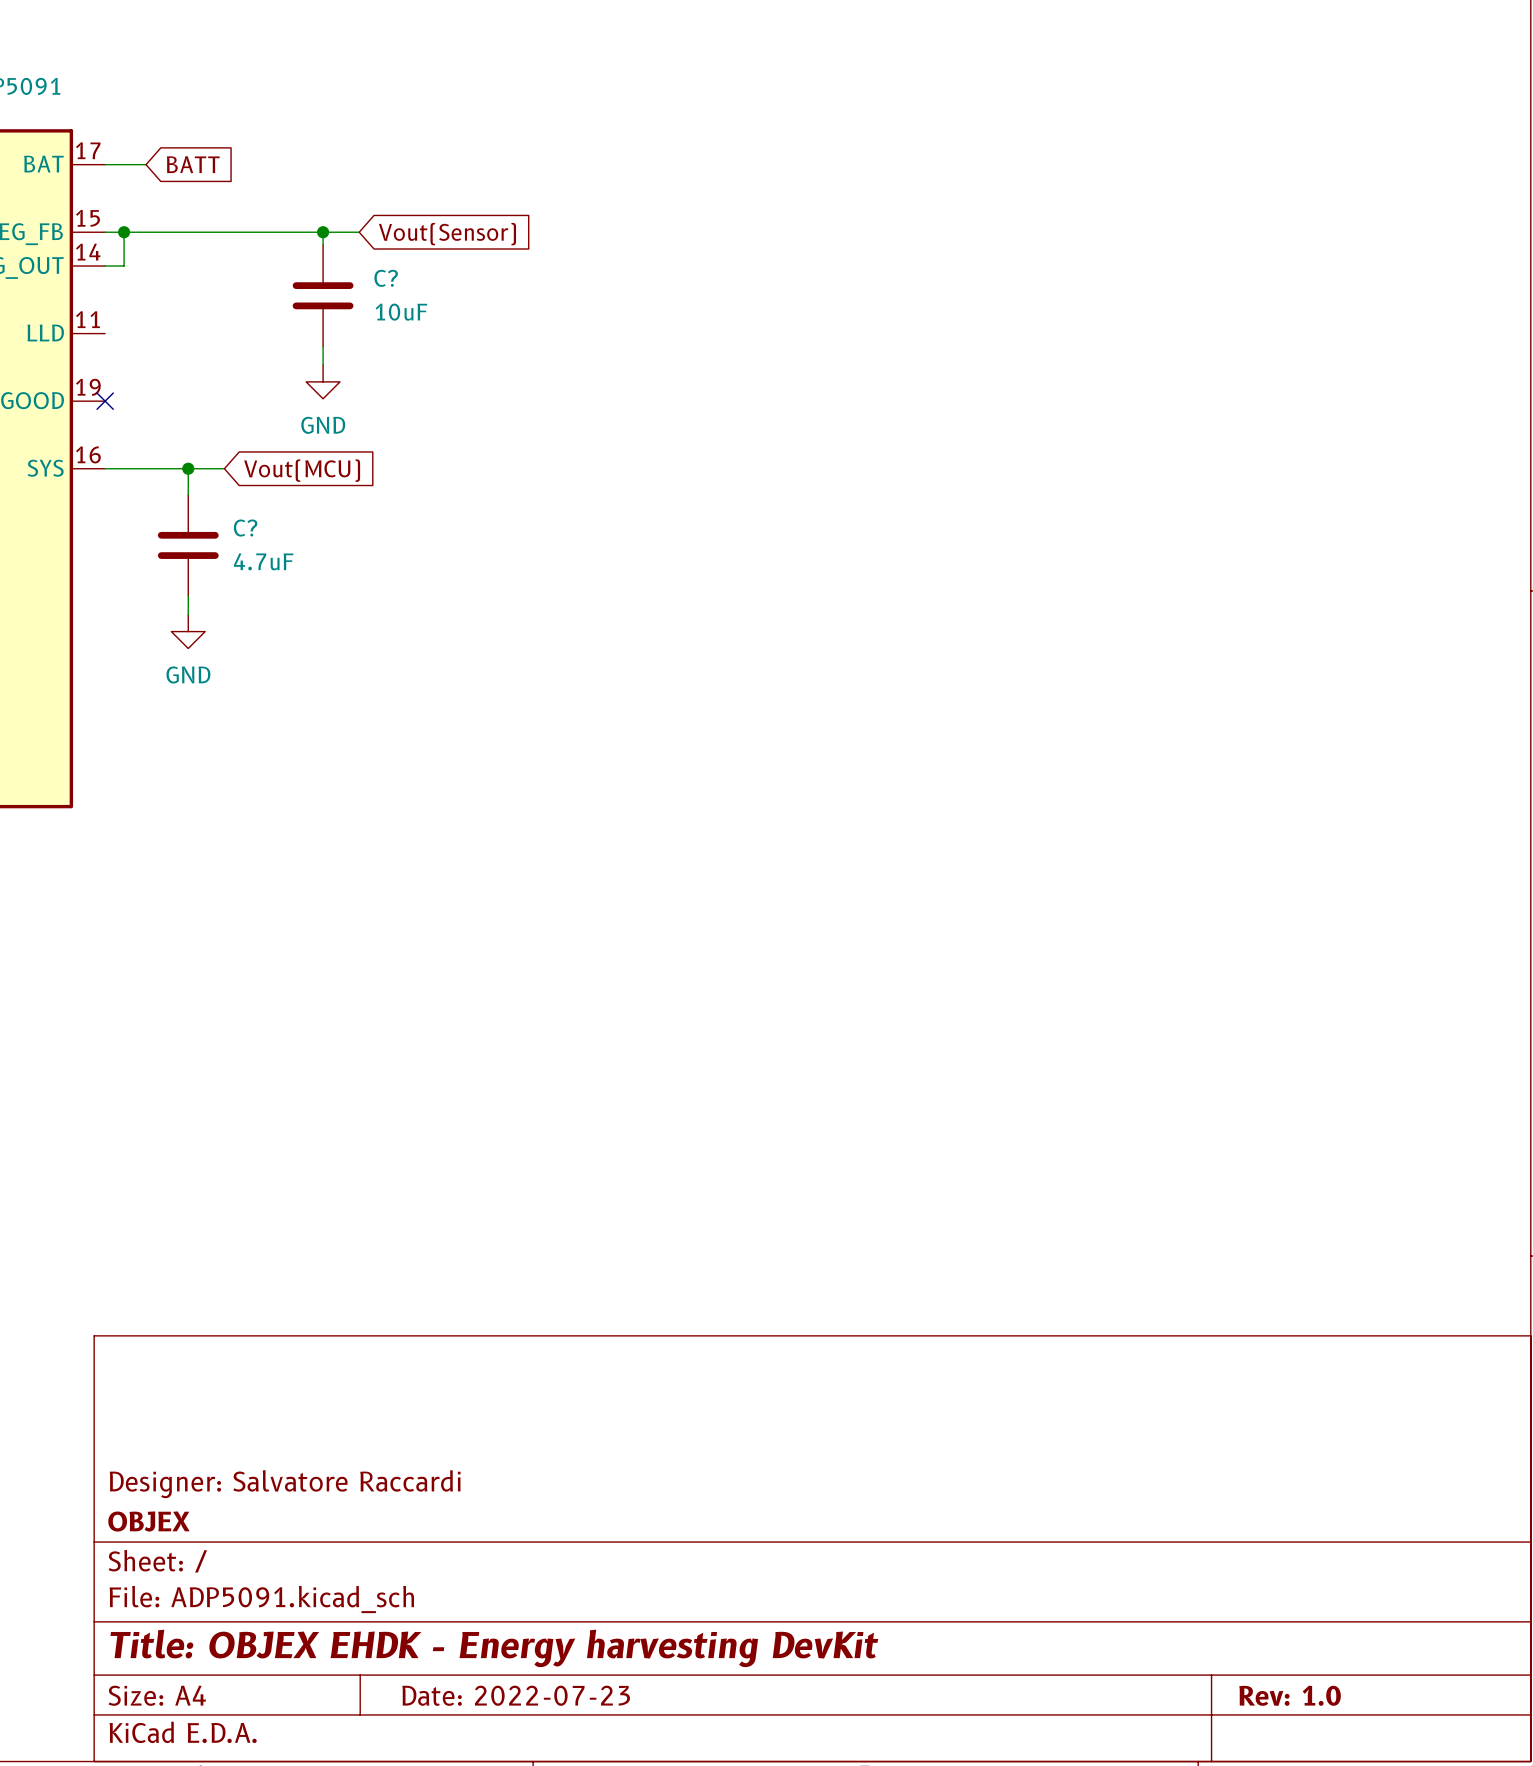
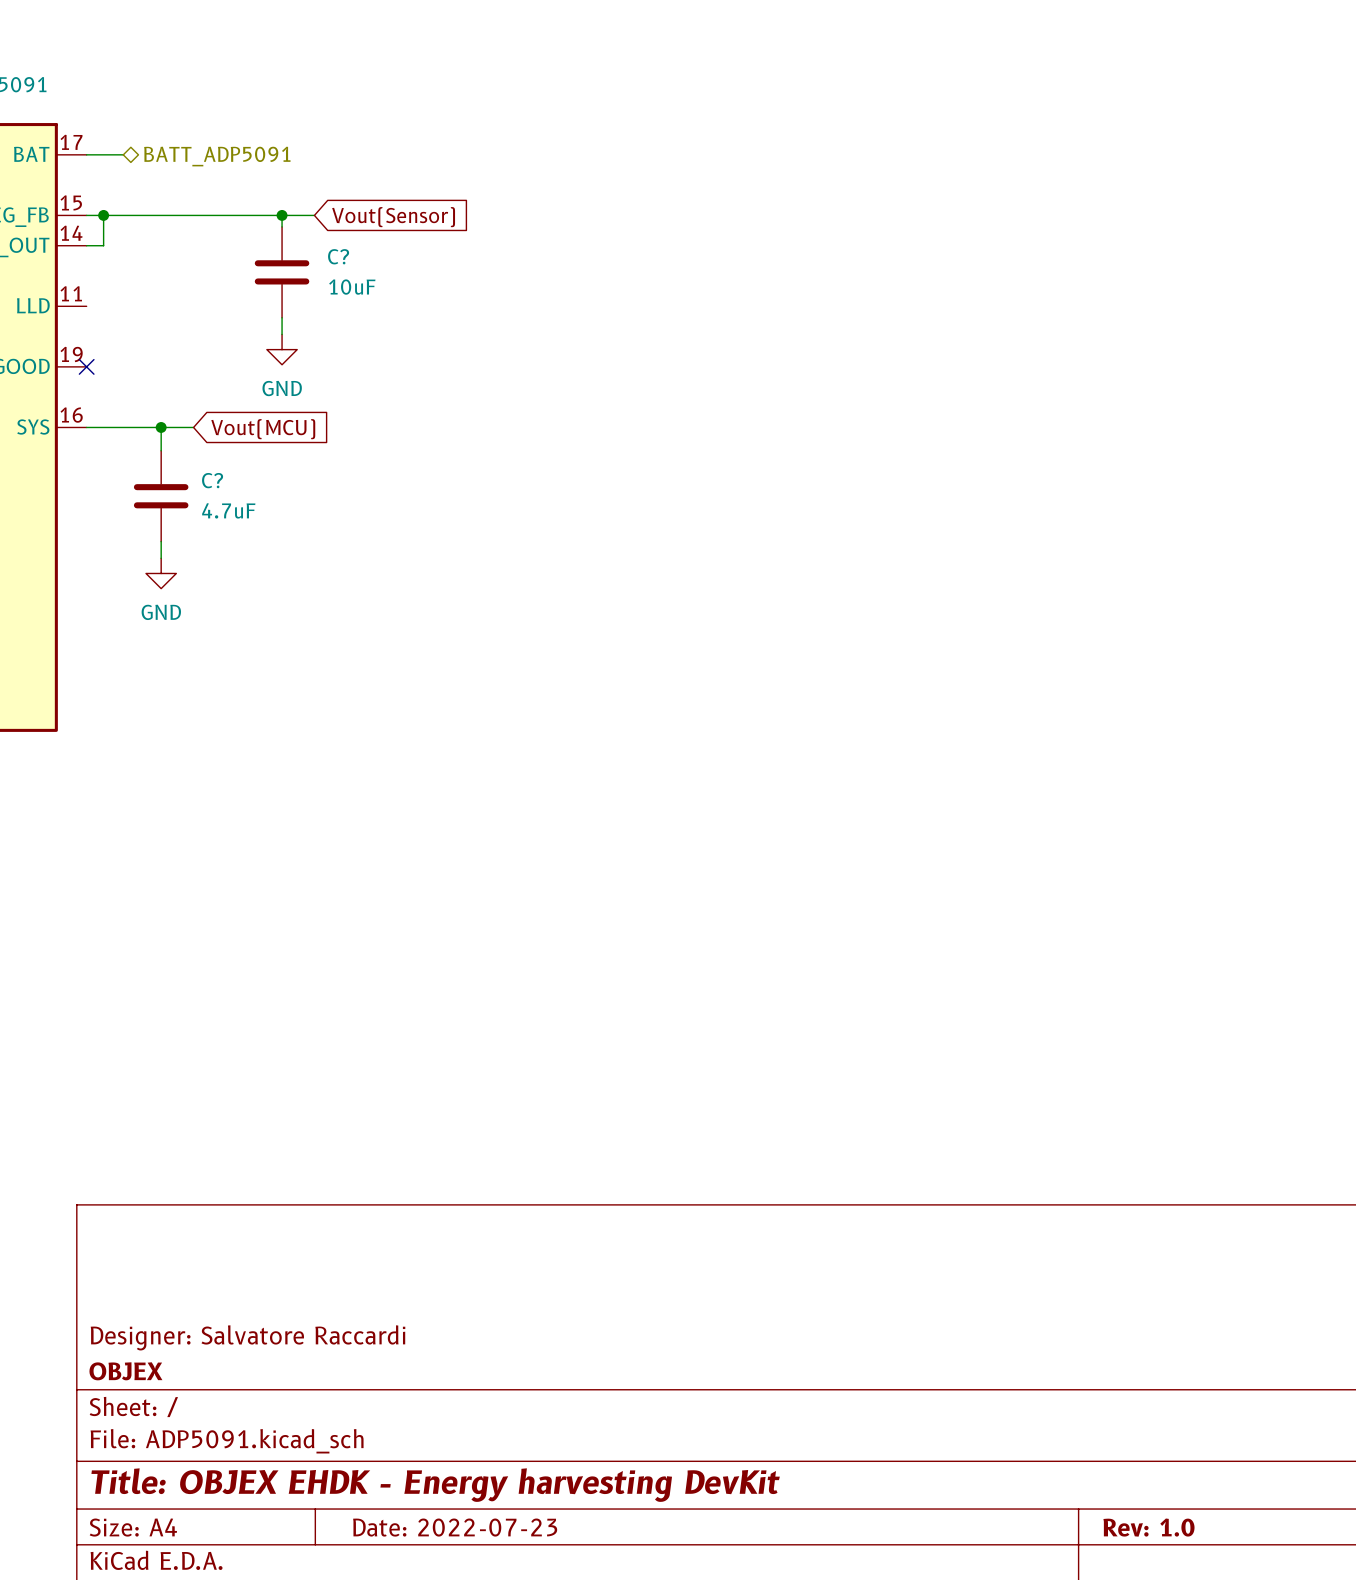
global label: BATT (193, 164) -> none
hierarchical label: none -> BATT_ADP5091 (217, 156)

